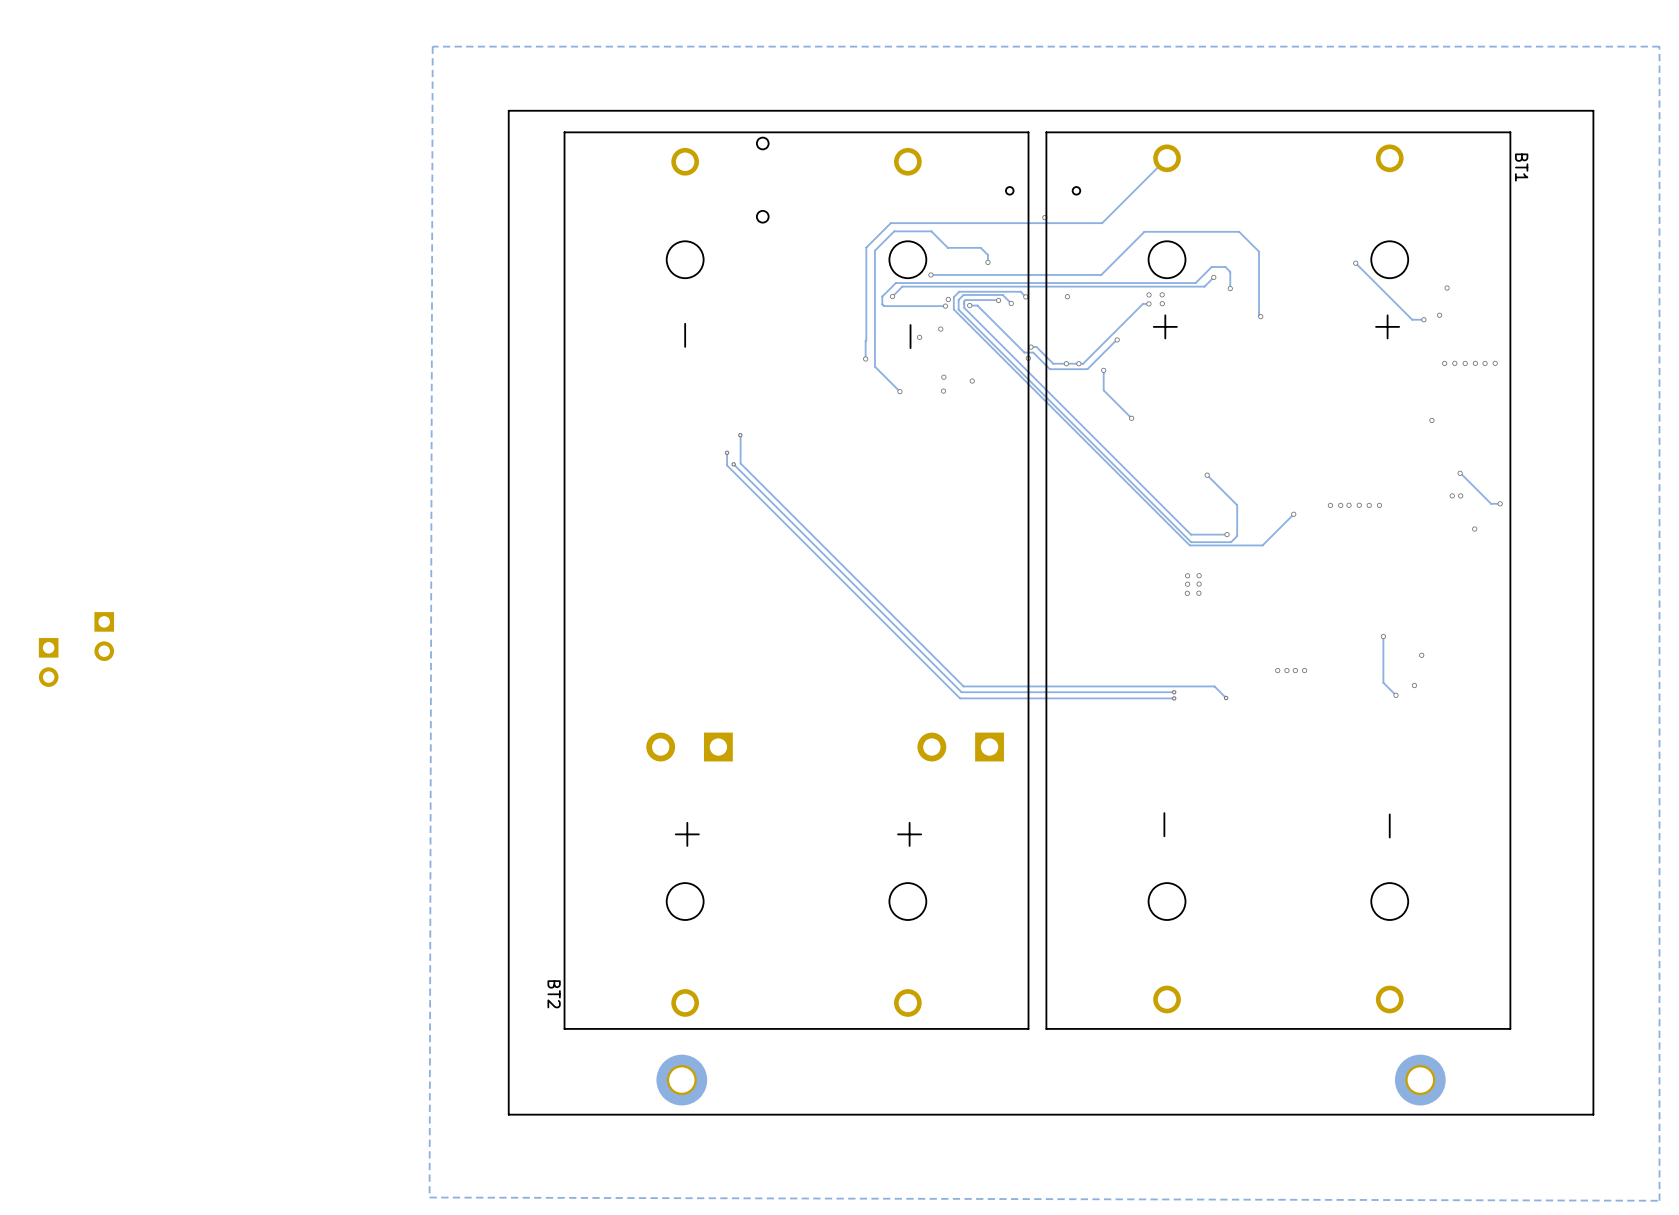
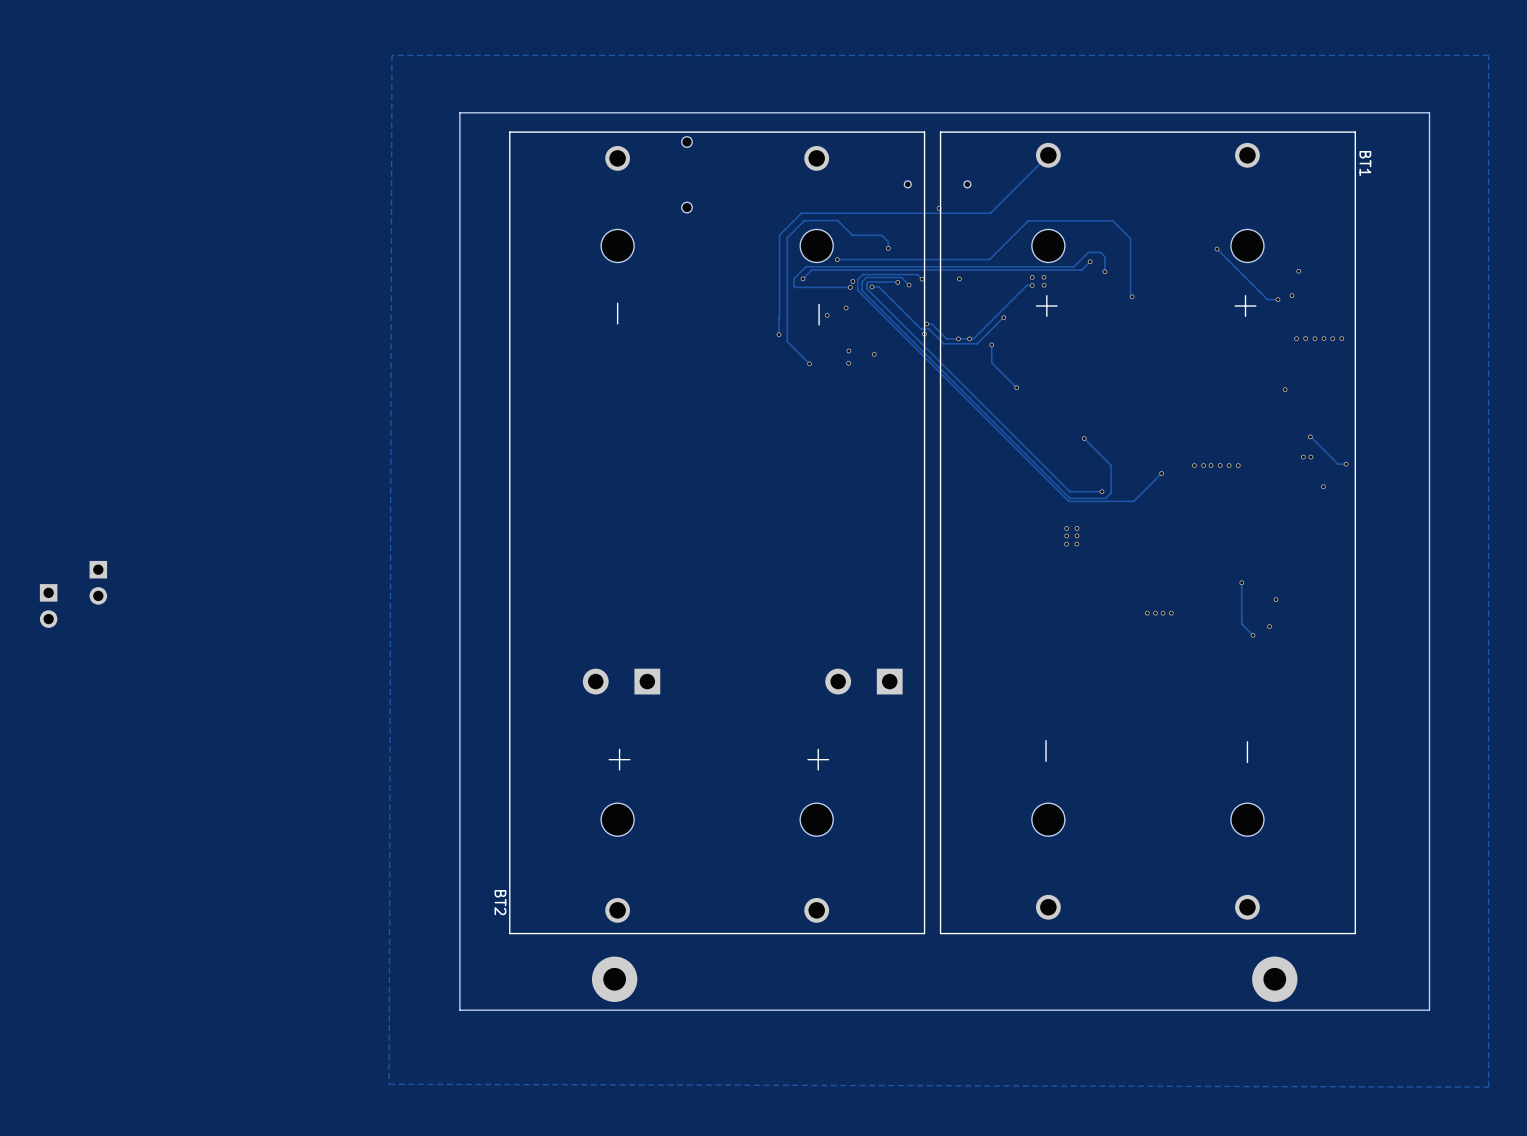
track: (740, 435) (740, 463) (963, 686) (1214, 686) (1226, 697) -> none
via: (740, 435) -> none
track: (727, 452) (727, 465) (960, 698) (1174, 698) -> none
via: (727, 452) -> none
track: (733, 464) (961, 692) (1174, 692) -> none
via: (733, 464) -> none
via: (1174, 692) -> none
via: (1226, 697) -> none
via: (1174, 698) -> none

